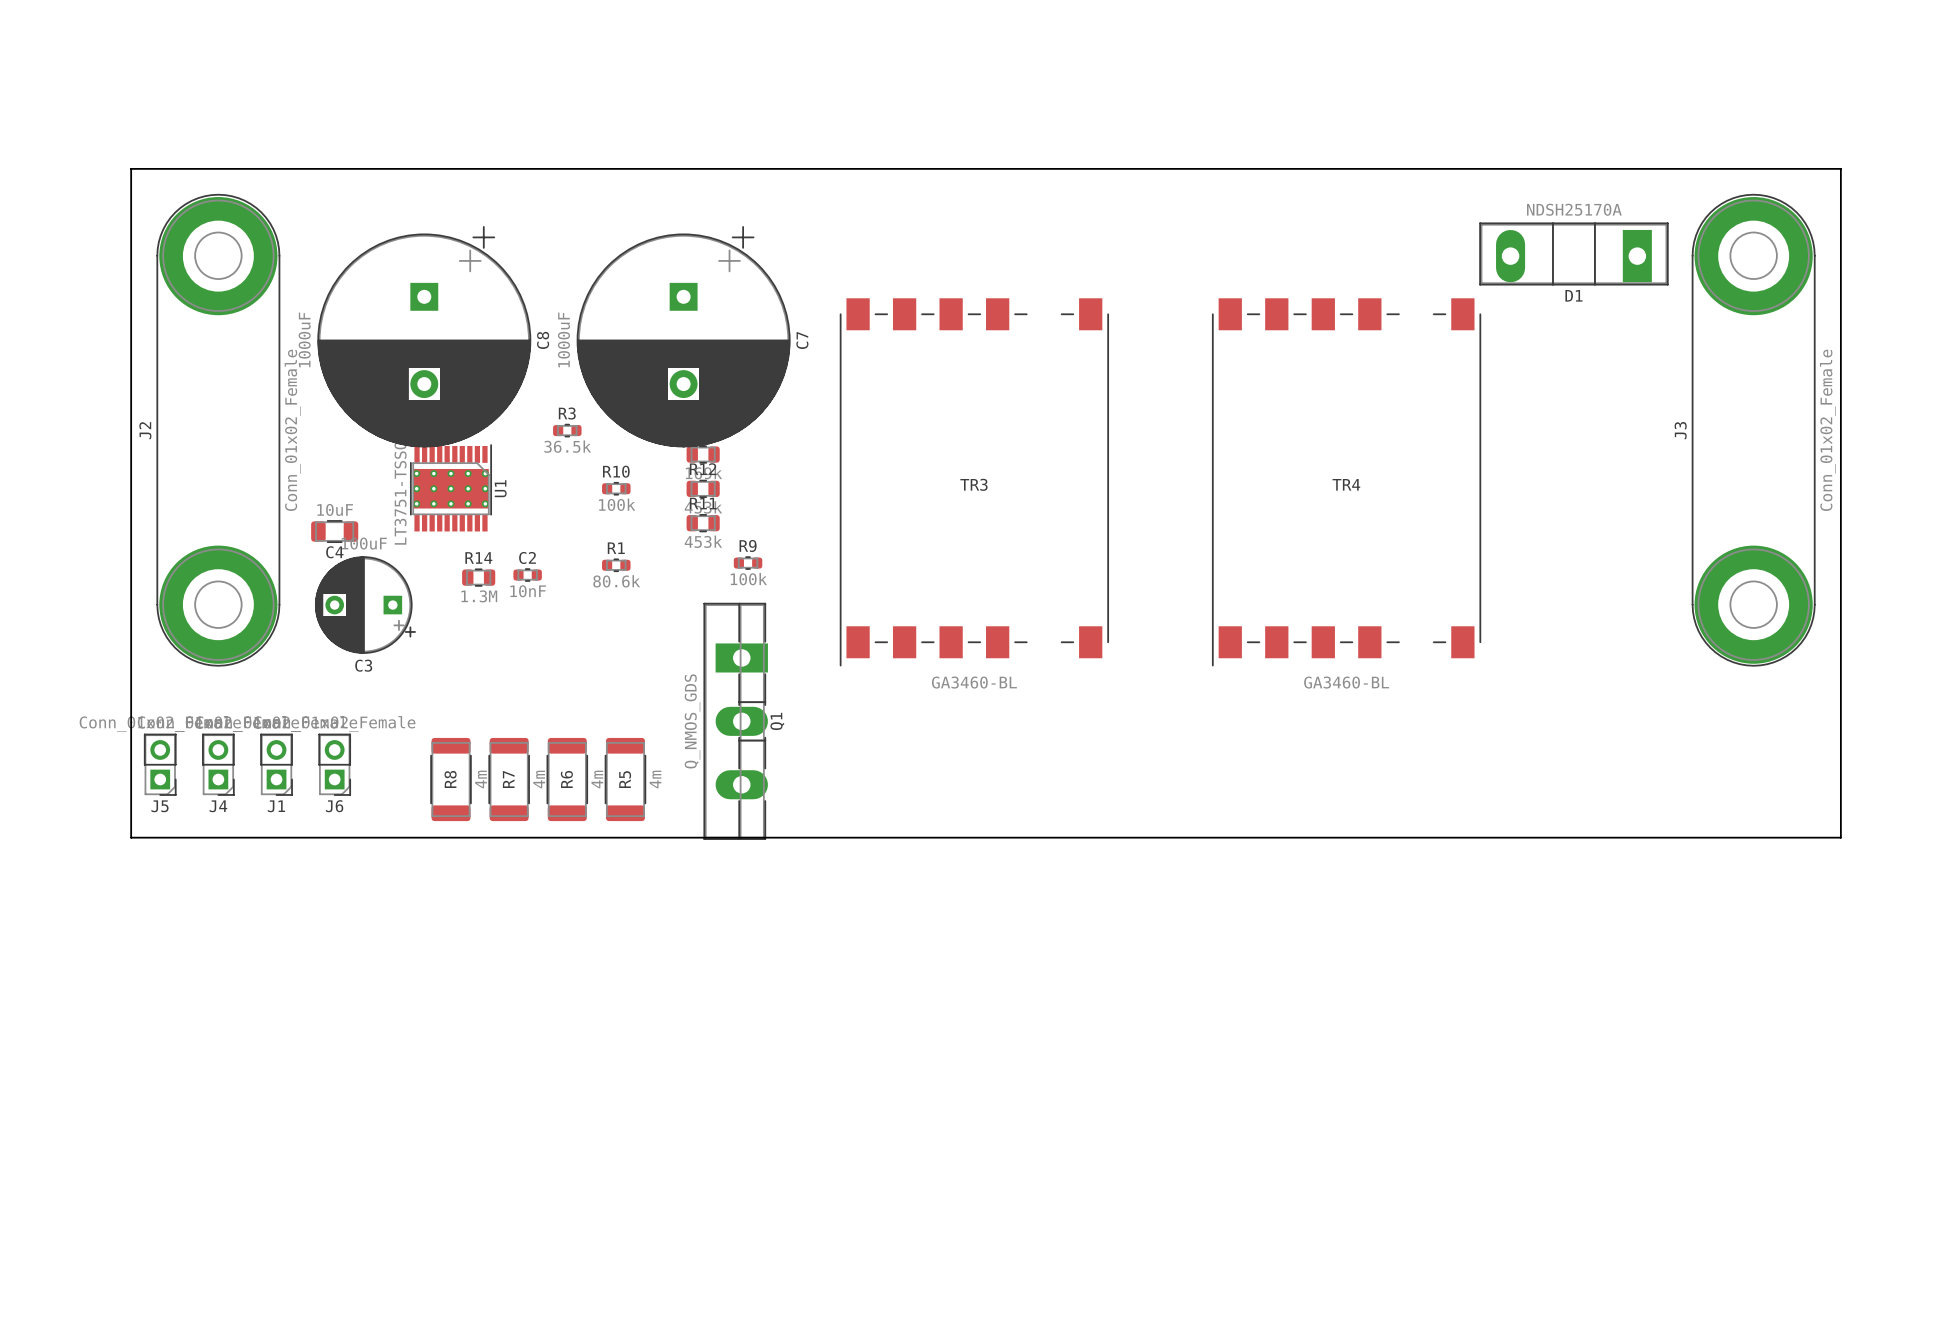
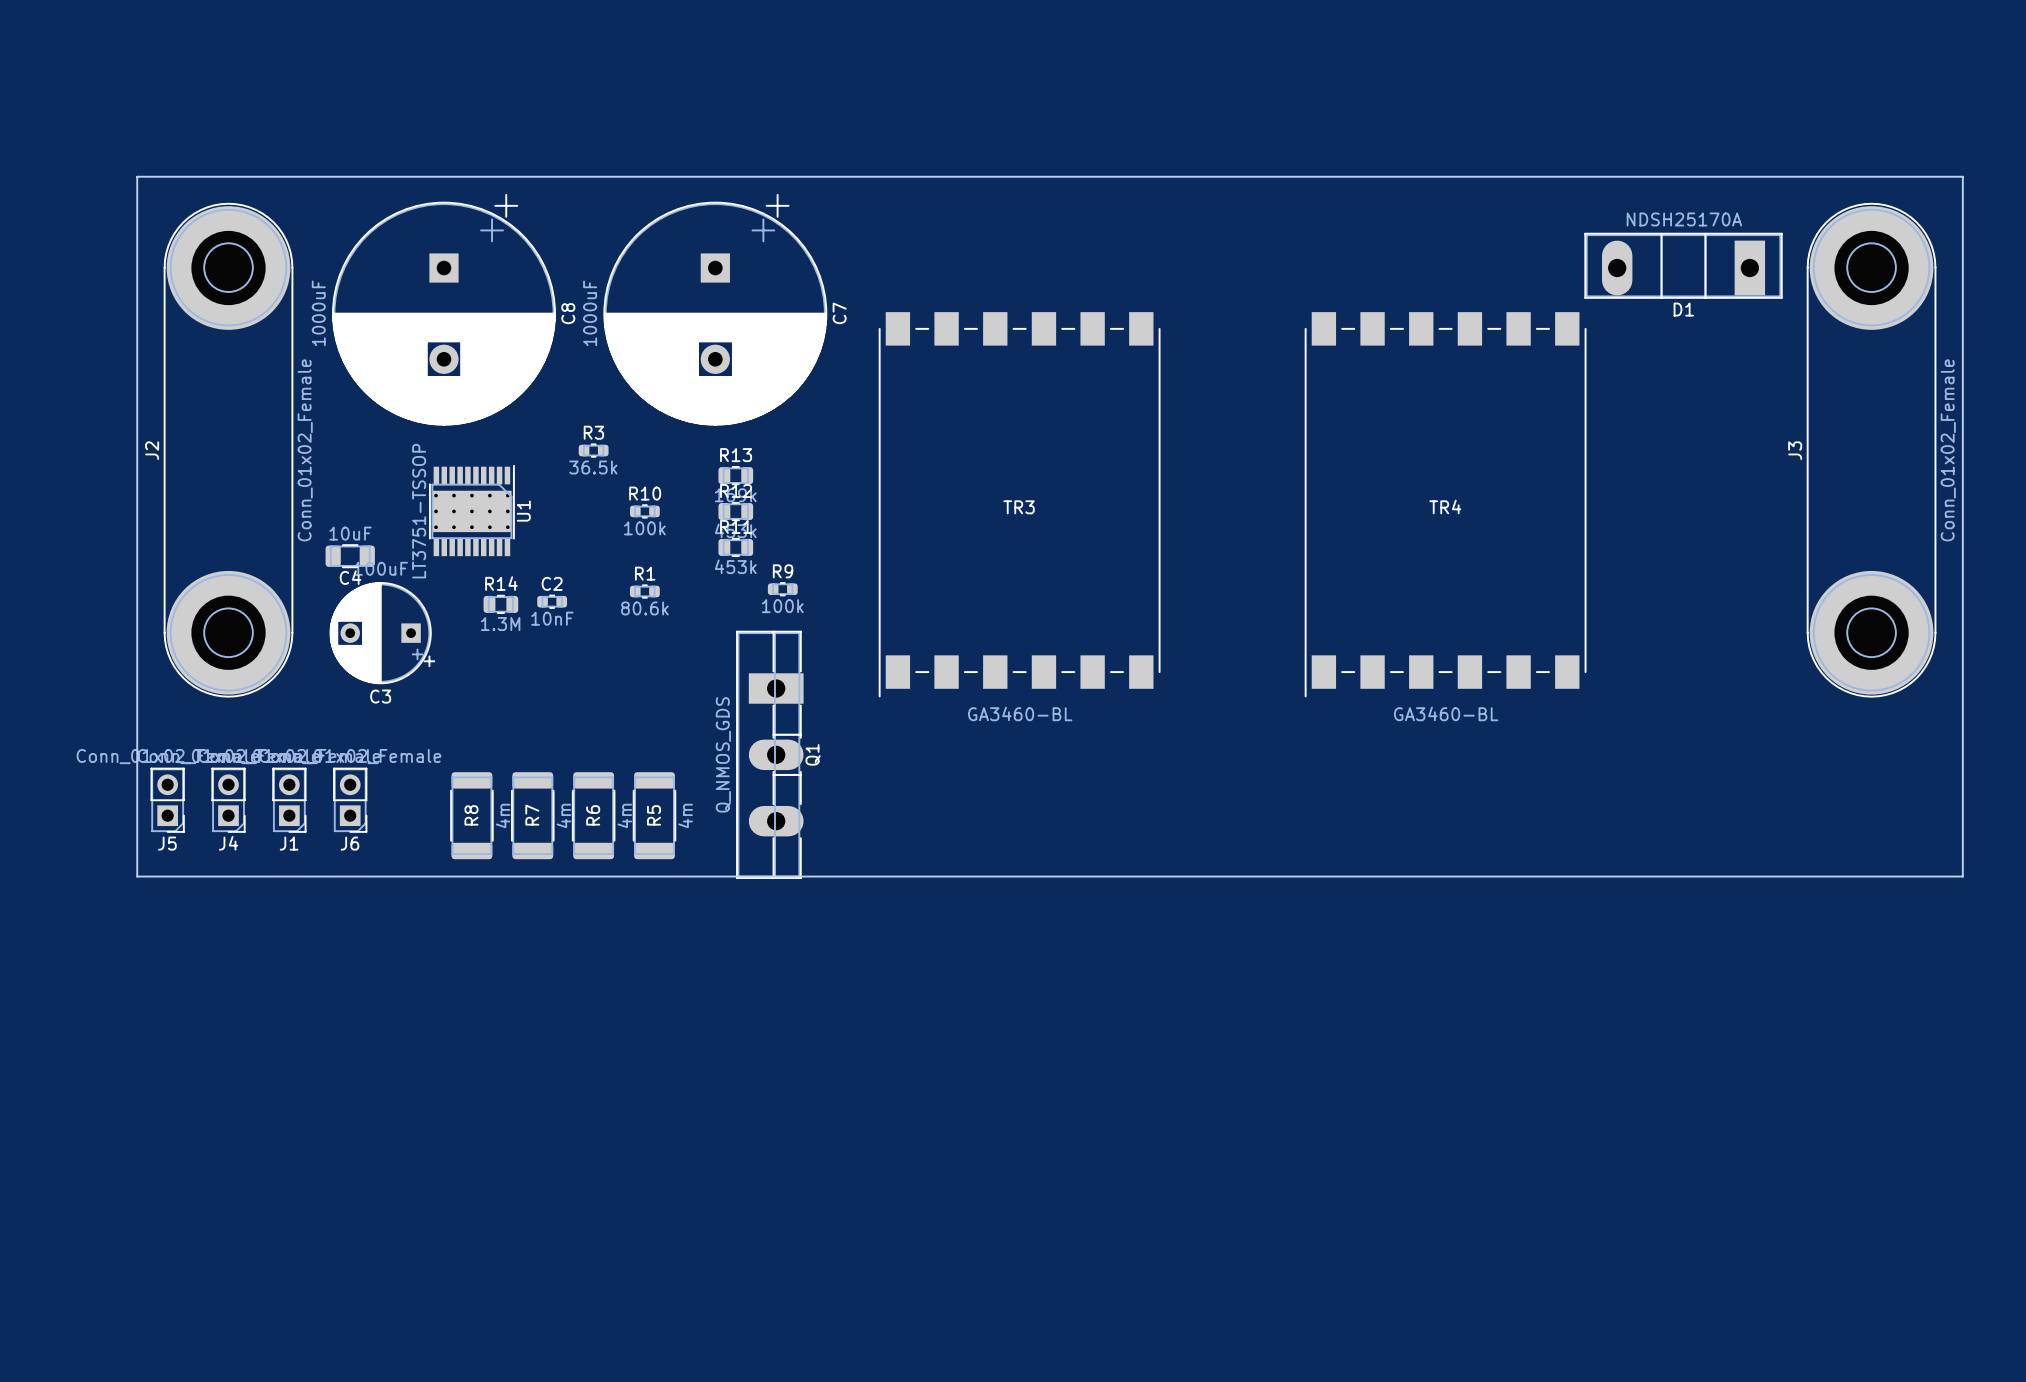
board edge: (1840, 168) (1840, 837) -> (1926, 176) (1962, 176) (1962, 876) (1926, 876)
D1 position: (1573, 253) -> (1683, 265)
TR3 footprint: [839, 298, 1110, 667] -> [878, 312, 1161, 698]
TR4 footprint: [1211, 298, 1482, 667] -> [1304, 312, 1587, 698]
C8 position: (424, 336) -> (443, 309)
C7 position: (683, 336) -> (715, 309)
J3 position: (1753, 430) -> (1871, 450)

